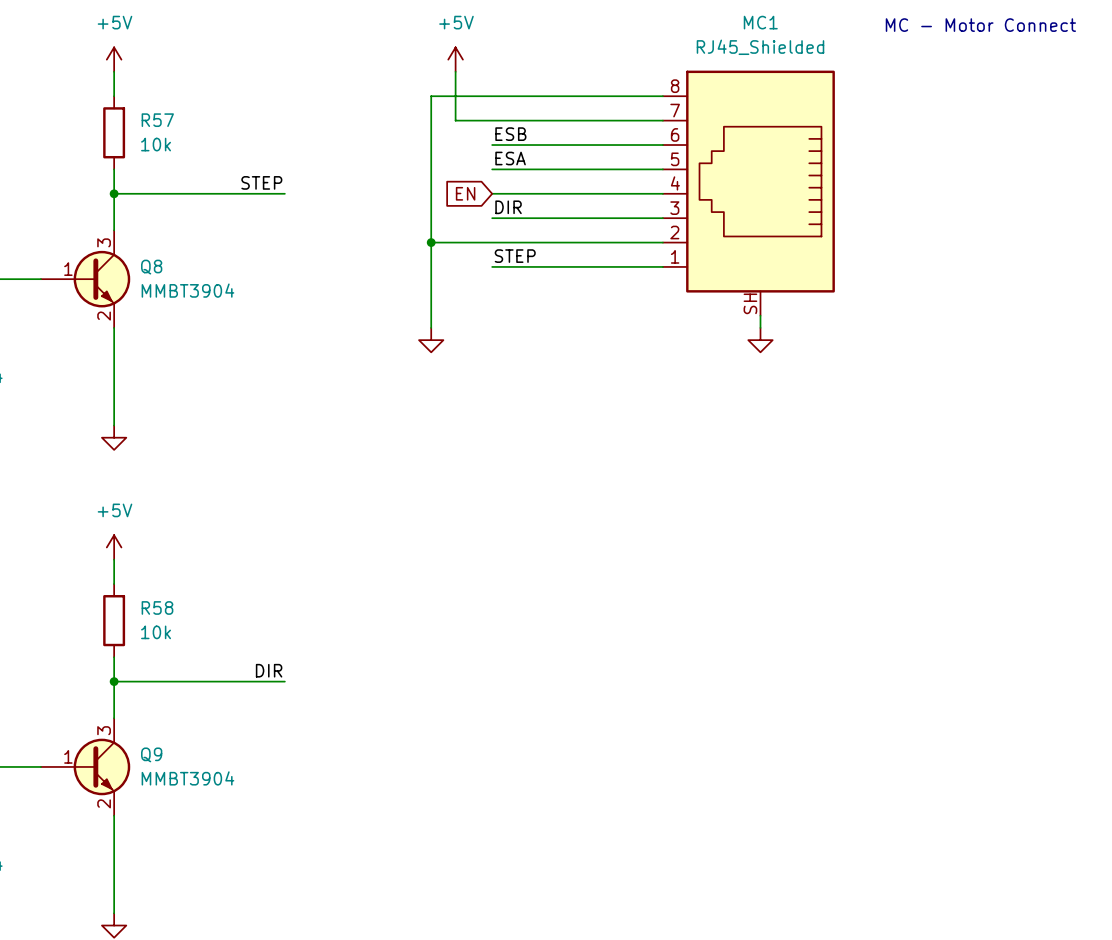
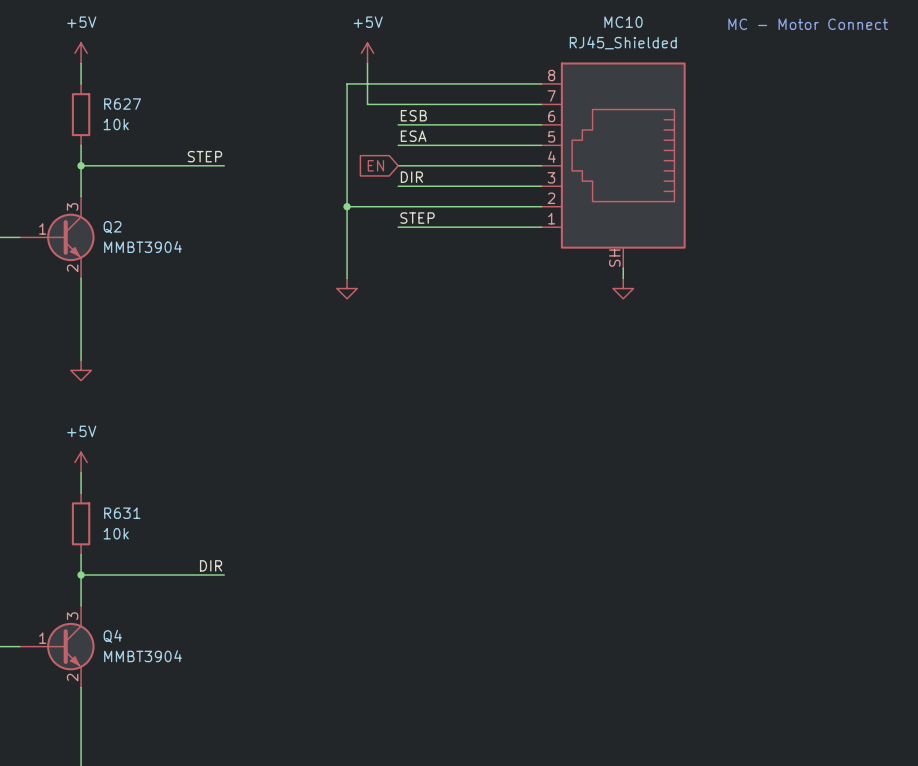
MC1 name: MC1 (760, 22) -> MC10 (623, 22)
R57 name: R57 (157, 120) -> R627 (122, 104)
Q8 name: Q8 (151, 267) -> Q2 (112, 227)
R58 name: R58 (157, 607) -> R631 (122, 513)
Q9 name: Q9 (151, 754) -> Q4 (112, 636)

